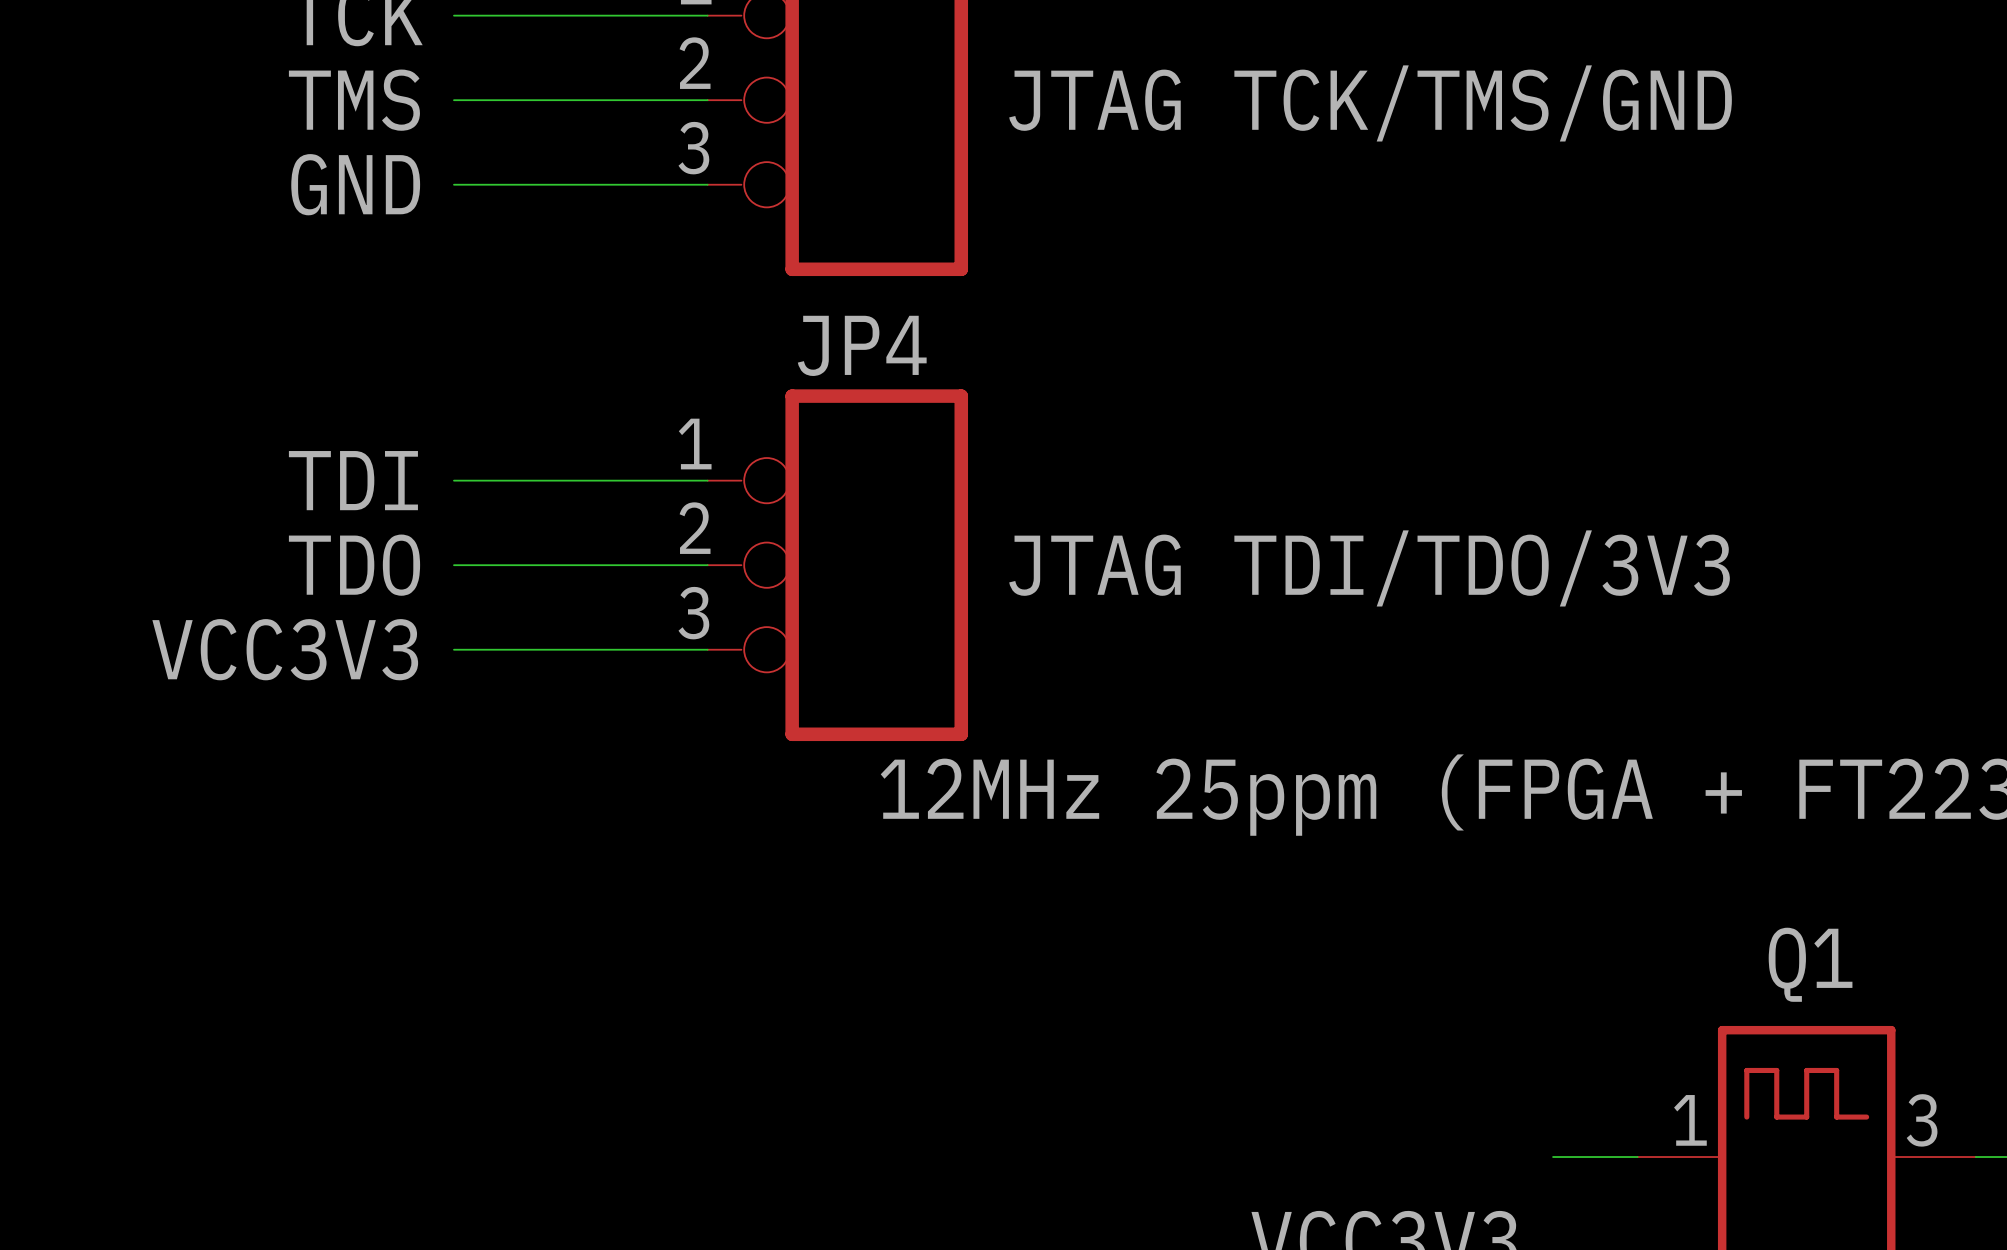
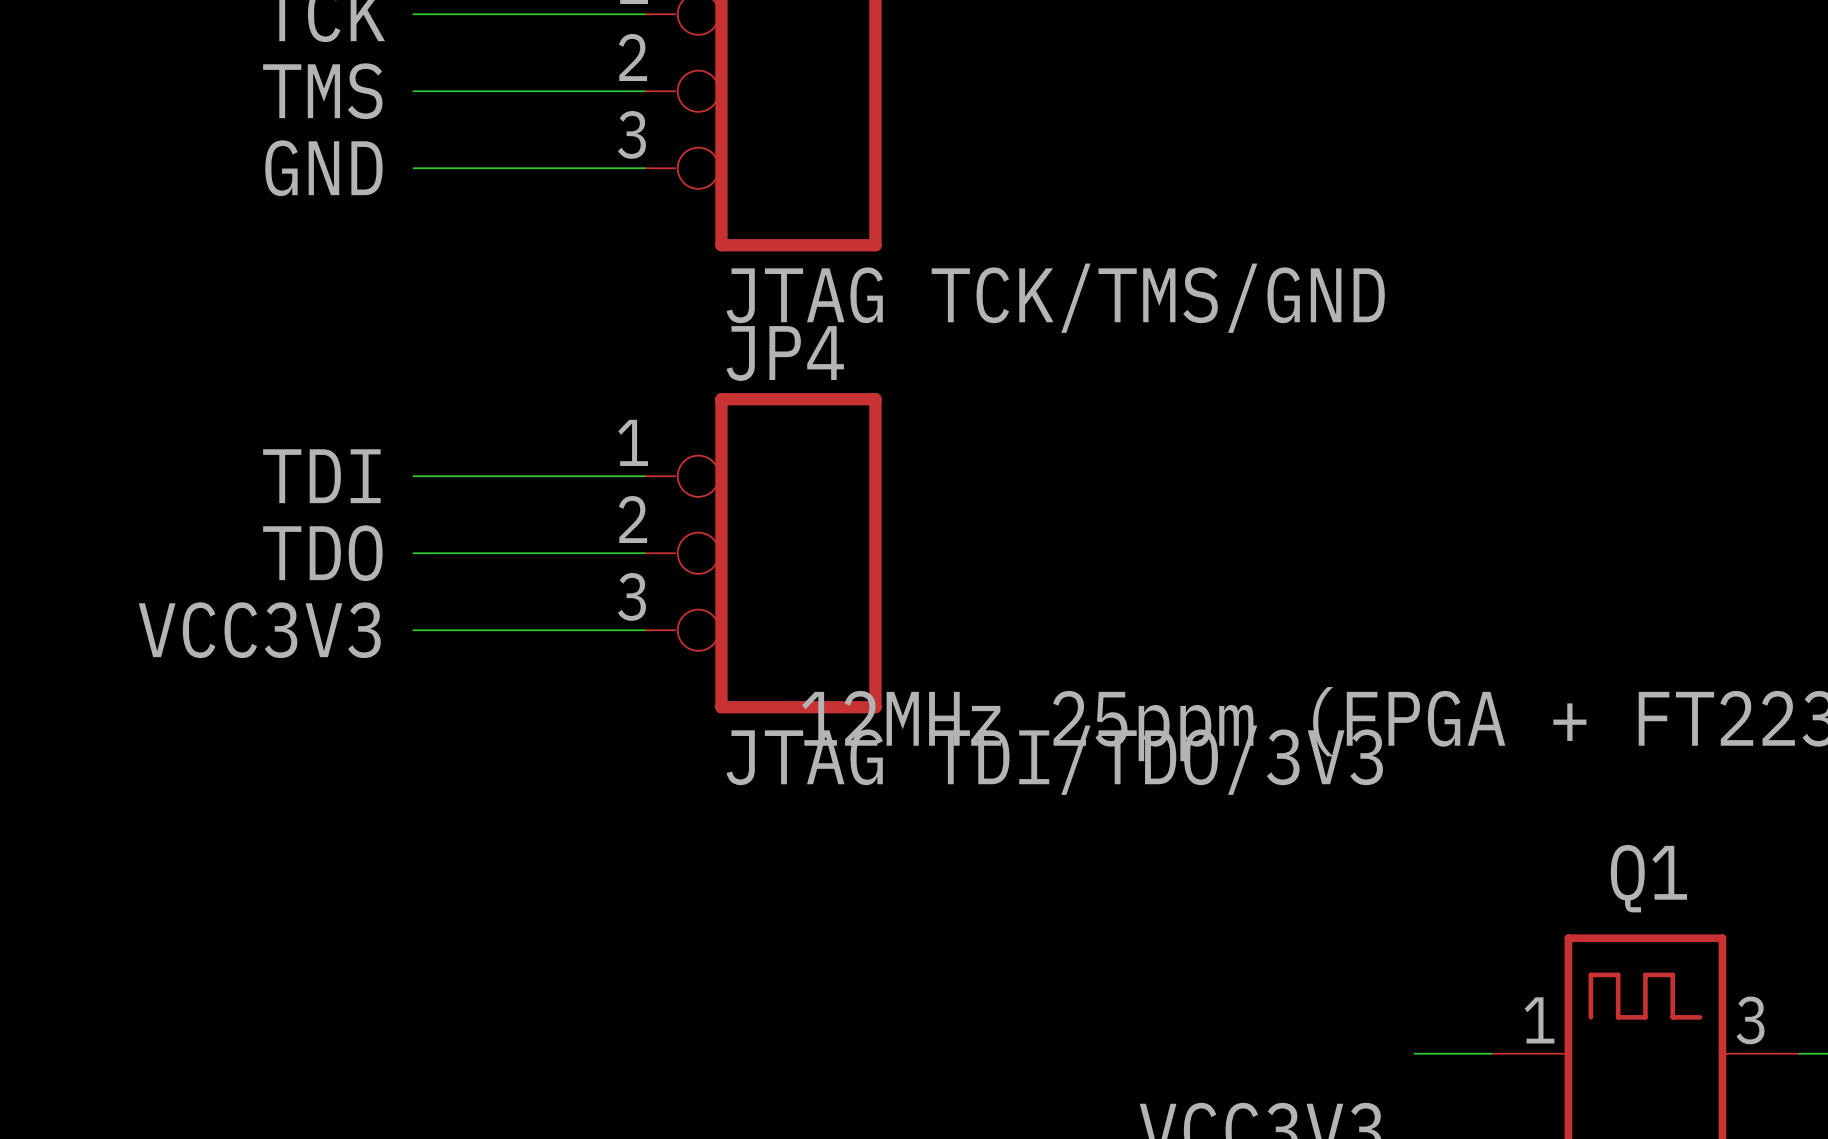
part value position: JTAG TCK/TMS/GND (1370, 103) -> JTAG TCK/TMS/GND (1055, 298)
label position: TDI (353, 480) -> TDI (321, 476)
wire: (453, 480) (707, 480) -> (413, 476) (644, 476)
label position: TDO (354, 565) -> TDO (322, 553)
wire: (453, 565) (707, 565) -> (413, 553) (644, 553)
JP4 position: (837, 565) -> (763, 553)
JP4 value position: JTAG TDI/TDO/3V3 (1369, 568) -> JTAG TDI/TDO/3V3 (1054, 760)
label position: VCC3V3 (285, 649) -> VCC3V3 (259, 630)
wire: (453, 649) (707, 649) -> (413, 630) (644, 630)

